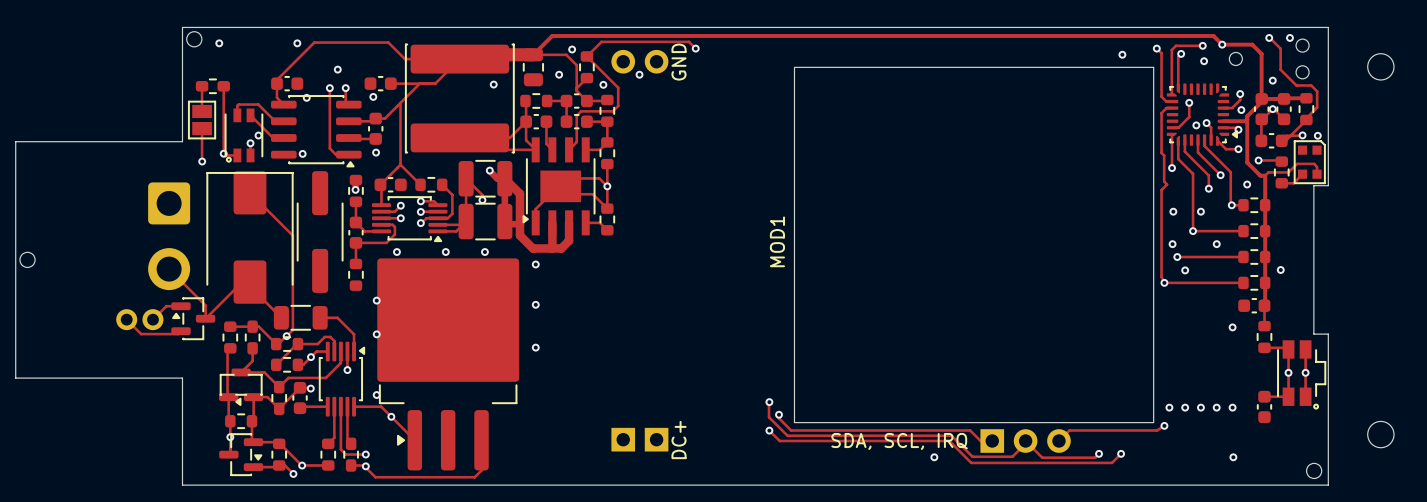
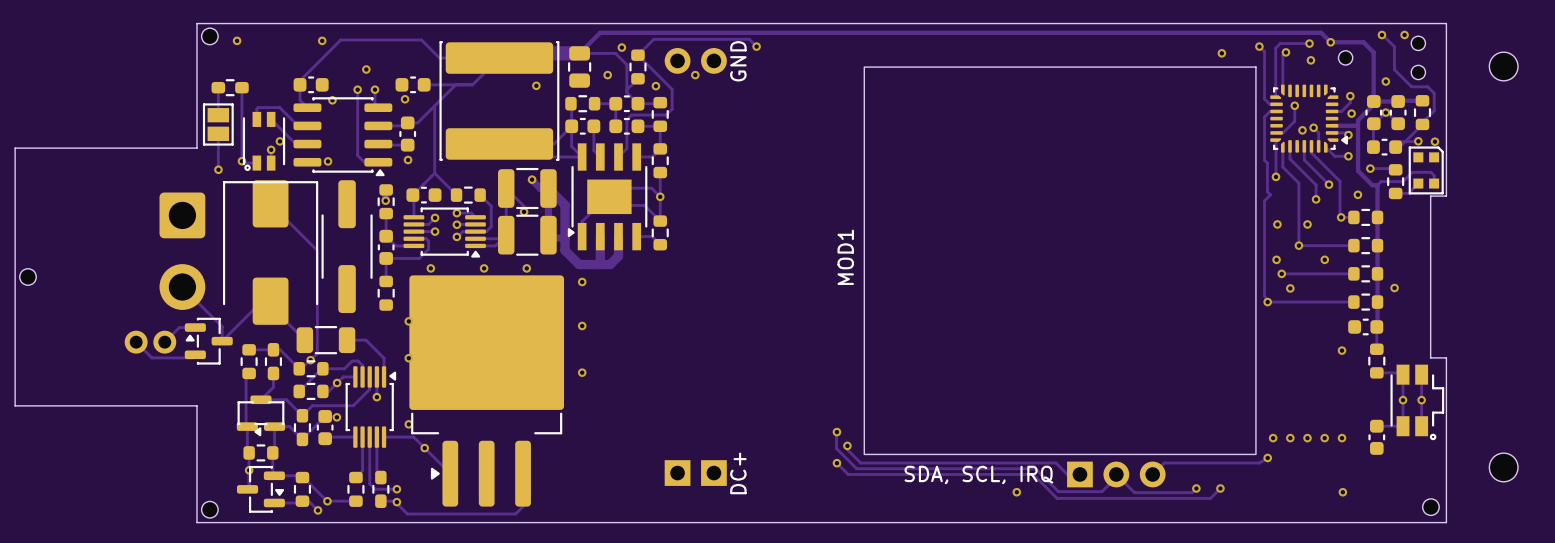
part: none -> (209, 509)

